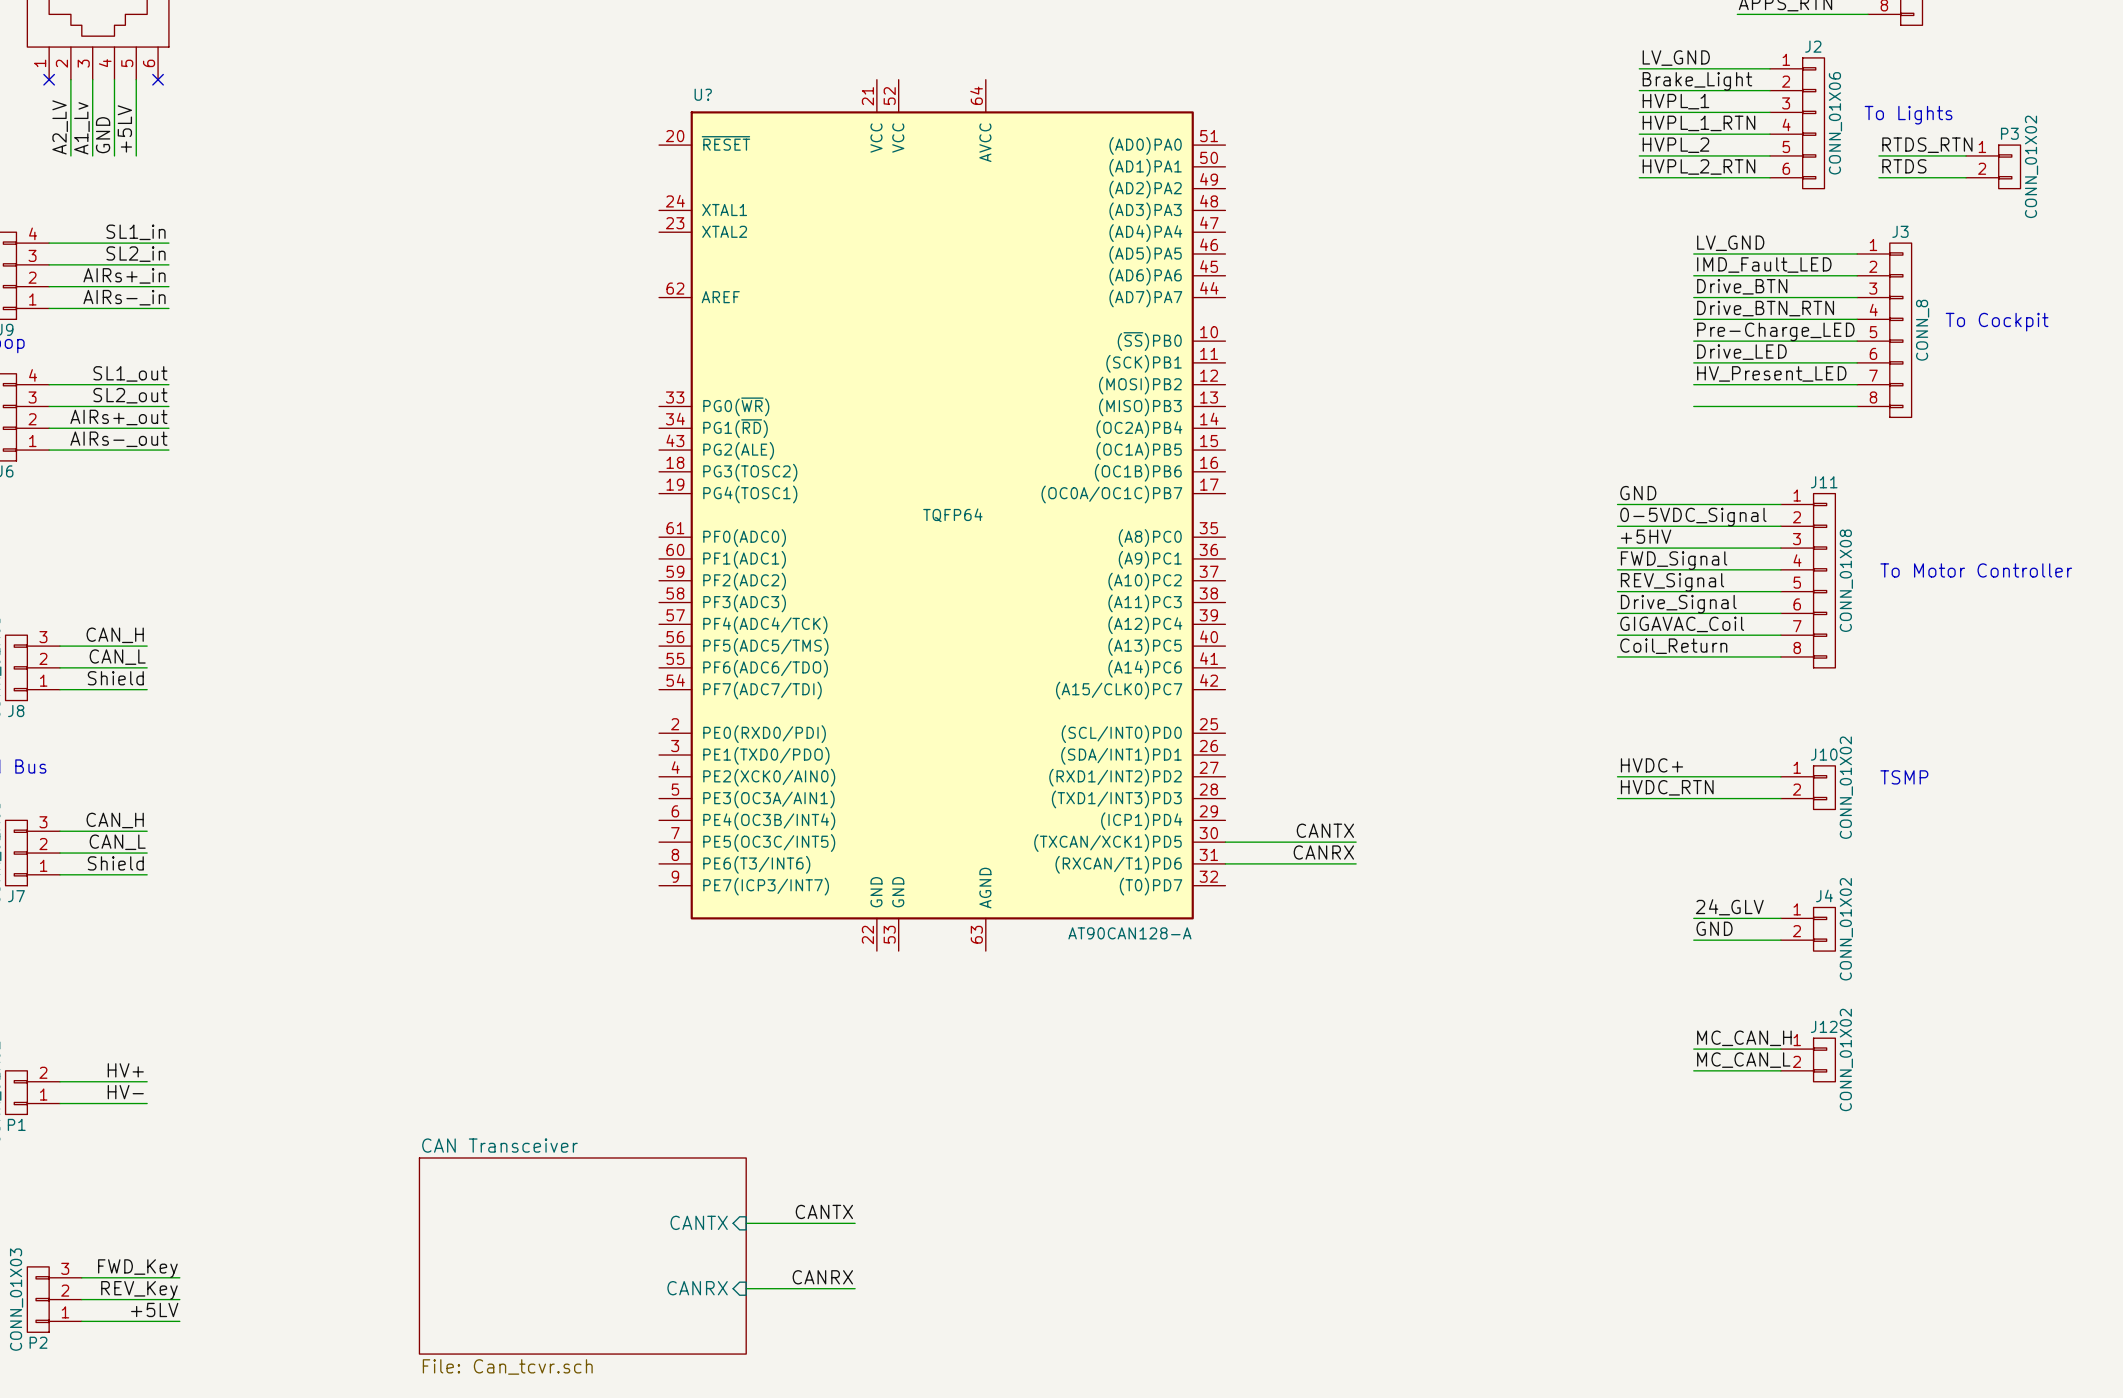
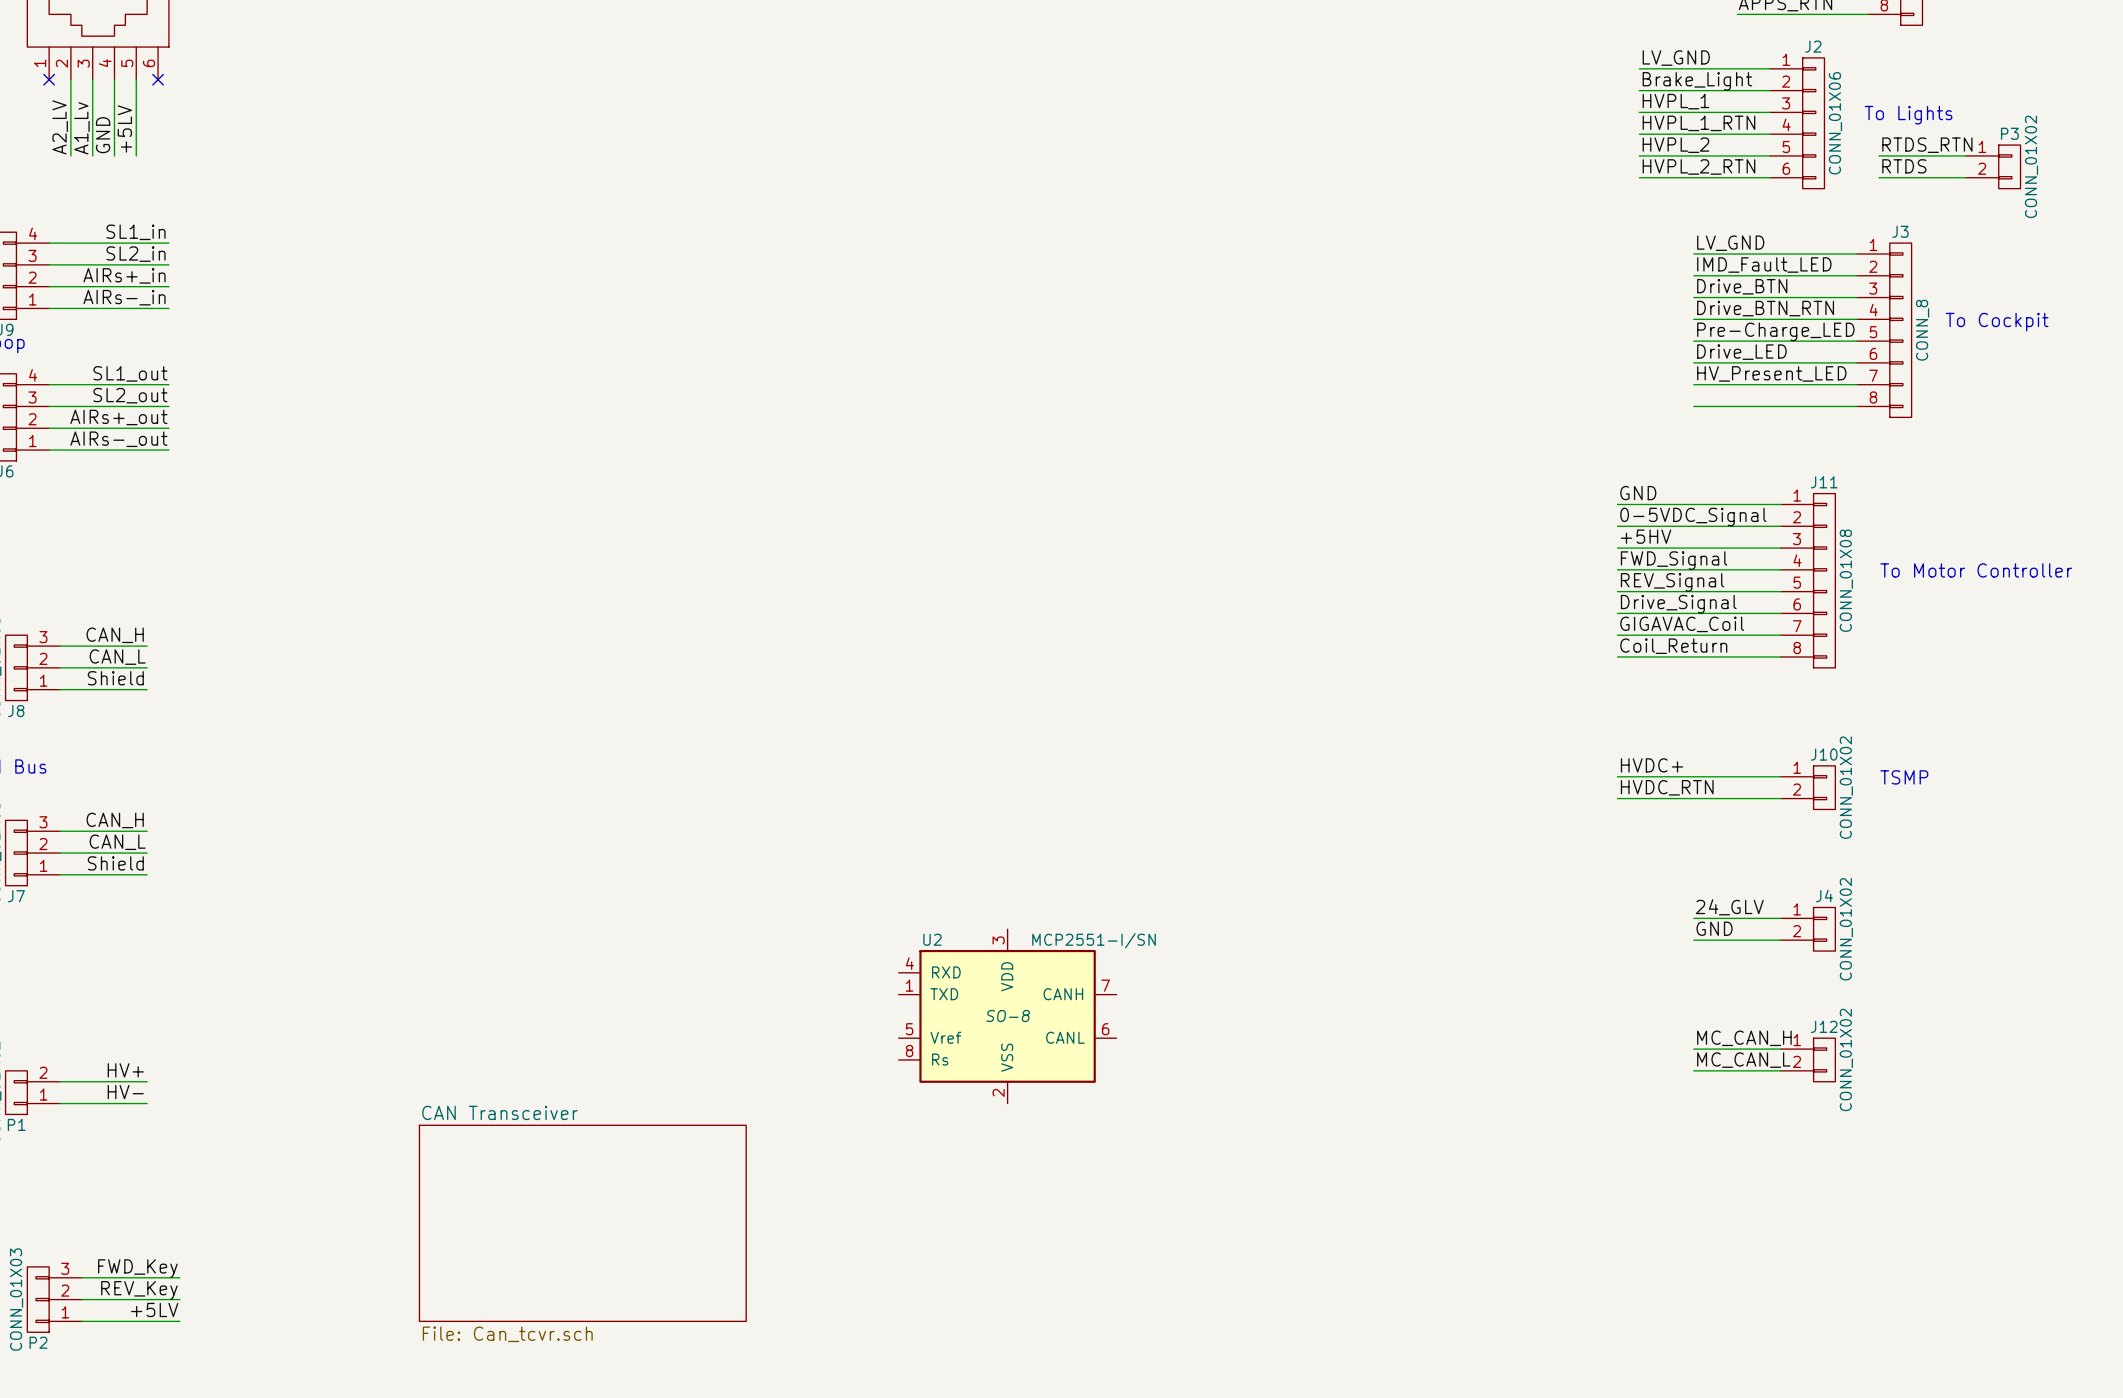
U?: AT90CAN128-A (942, 515) -> none
label: CANTX (1325, 830) -> none
wire: (1225, 842) (1356, 842) -> none
label: CANRX (1323, 852) -> none
wire: (1225, 863) (1356, 863) -> none
U2: none -> MCP2551-I/SN (1007, 1016)
label: CANTX (824, 1211) -> none
sheet pin: CANTX (699, 1222) -> none
wire: (746, 1223) (855, 1223) -> none
sheet CAN Transceiver position: (582, 1256) -> (582, 1223)
label: CANRX (822, 1277) -> none
sheet pin: CANRX (697, 1288) -> none
wire: (746, 1288) (855, 1288) -> none

